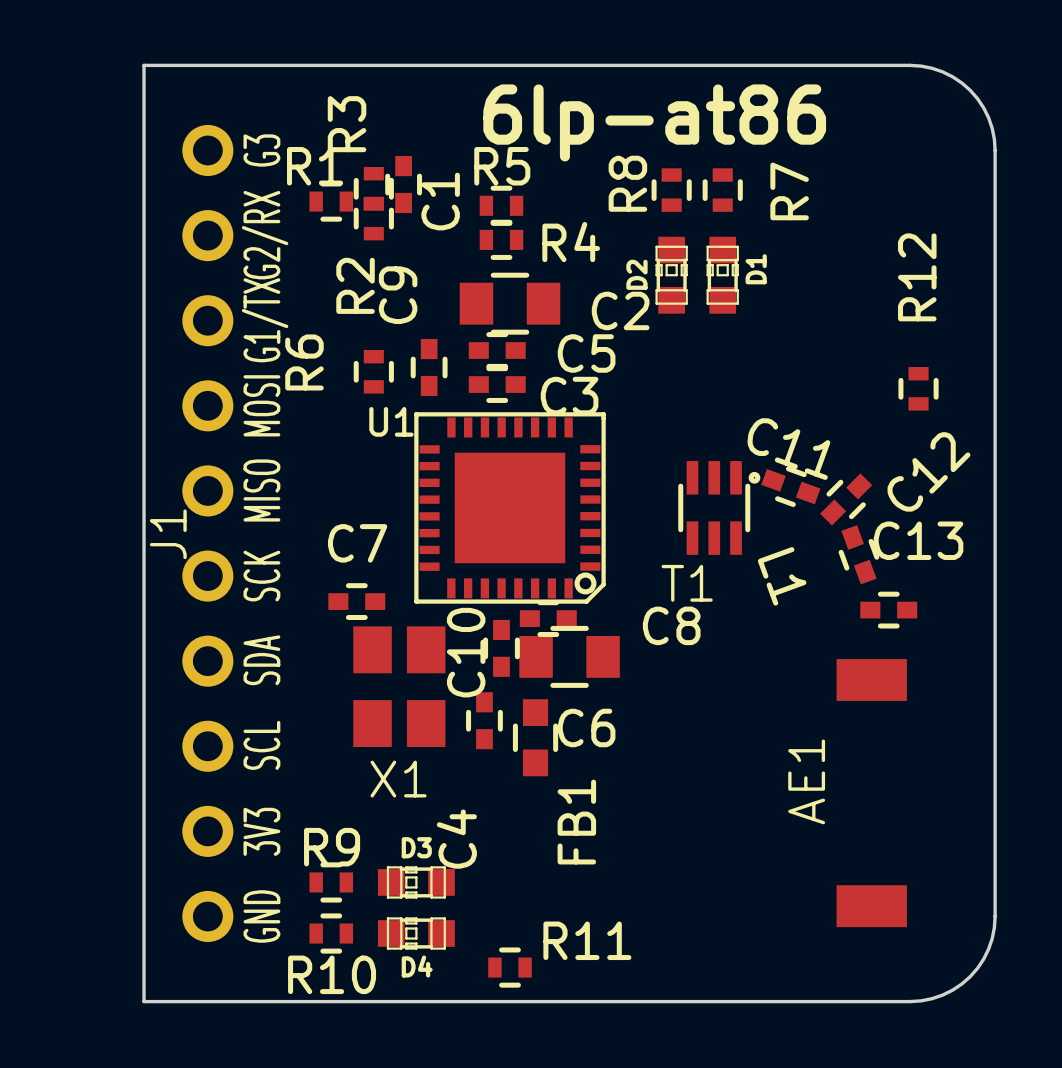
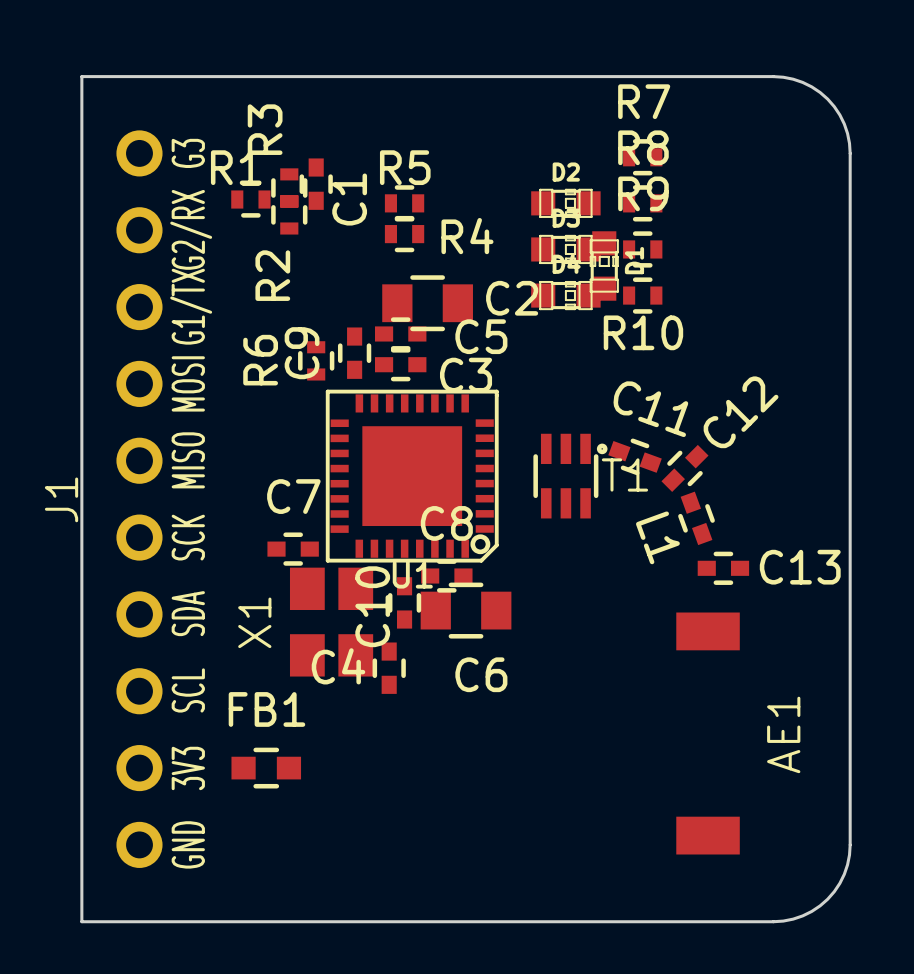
text: 6lp-at86 (654, 122) -> none
R8 rotation: 0° (671, 190) -> 90° clockwise (642, 203)
R8 position: (671, 190) -> (642, 203)
R7 rotation: 0° (722, 190) -> 90° clockwise (642, 157)
R7 position: (722, 190) -> (642, 157)
R7 name position: R7 (789, 191) -> R7 (644, 101)
D2 rotation: 0° (671, 275) -> 90° clockwise (565, 203)
D2 position: (671, 275) -> (565, 203)
C9 name position: C9 (398, 295) -> C9 (302, 353)
C2 position: (510, 303) -> (427, 303)
R6 name position: R6 (304, 362) -> R6 (260, 360)
C9 position: (429, 367) -> (354, 353)
R6 position: (373, 371) -> (316, 360)
R12: (918, 388) -> none
U1 name position: U1 (391, 421) -> U1 (412, 575)
C11 name position: C11 (788, 449) -> C11 (650, 409)
C12 name position: C12 (928, 471) -> C12 (741, 412)
C11 position: (790, 486) -> (635, 456)
C12 position: (846, 499) -> (684, 468)
T1 position: (719, 507) -> (570, 476)
J1 name position: J1 (168, 534) -> J1 (61, 499)
C13 name position: C13 (918, 540) -> C13 (800, 567)
L1 position: (858, 554) -> (696, 518)
T1 name position: T1 (687, 583) -> T1 (624, 474)
C7 position: (356, 601) -> (293, 549)
C13 position: (888, 610) -> (723, 568)
C8 name position: C8 (671, 625) -> C8 (446, 523)
X1 position: (399, 686) -> (331, 622)
FB1 rotation: 0° (535, 737) -> 90° clockwise (266, 768)
FB1 position: (535, 737) -> (266, 768)
X1 name rotation: 0° (398, 779) -> 90° counterclockwise (254, 622)
X1 name position: X1 (398, 779) -> X1 (254, 622)
AE1 name position: AE1 (806, 781) -> AE1 (783, 734)
AE1 position: (871, 793) -> (708, 733)
FB1 name position: FB1 (576, 822) -> FB1 (266, 709)
C4 name rotation: 0° (456, 839) -> 90° clockwise (338, 666)
C4 name position: C4 (456, 839) -> C4 (338, 666)
R9 name position: R9 (332, 847) -> R9 (643, 193)
R9 position: (331, 882) -> (642, 249)
D3 rotation: 0° (416, 882) -> 180° (565, 249)
D3 position: (416, 882) -> (565, 249)
R10 position: (331, 933) -> (642, 295)
D4 rotation: 0° (416, 933) -> 180° (565, 295)
D4 position: (416, 933) -> (565, 295)
R11: (510, 967) -> none

